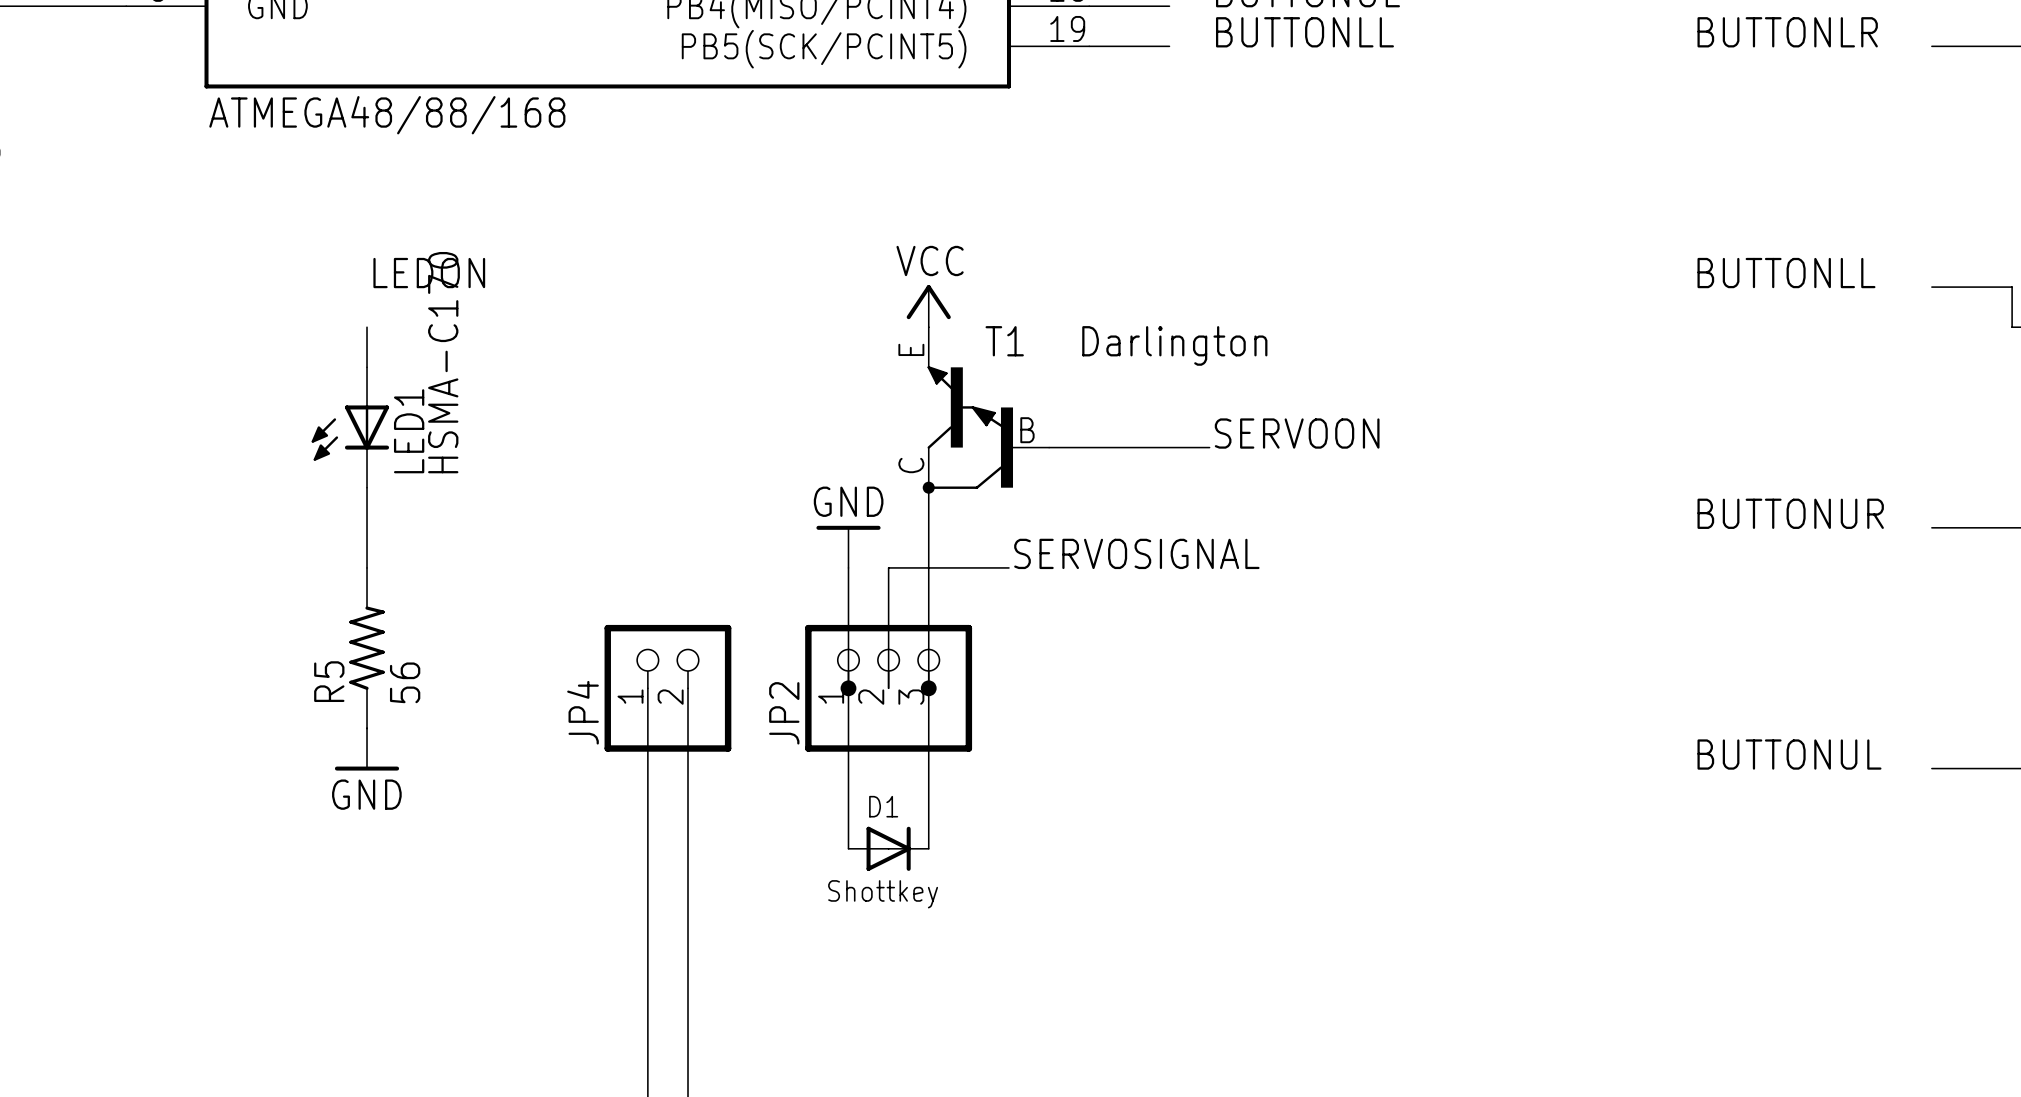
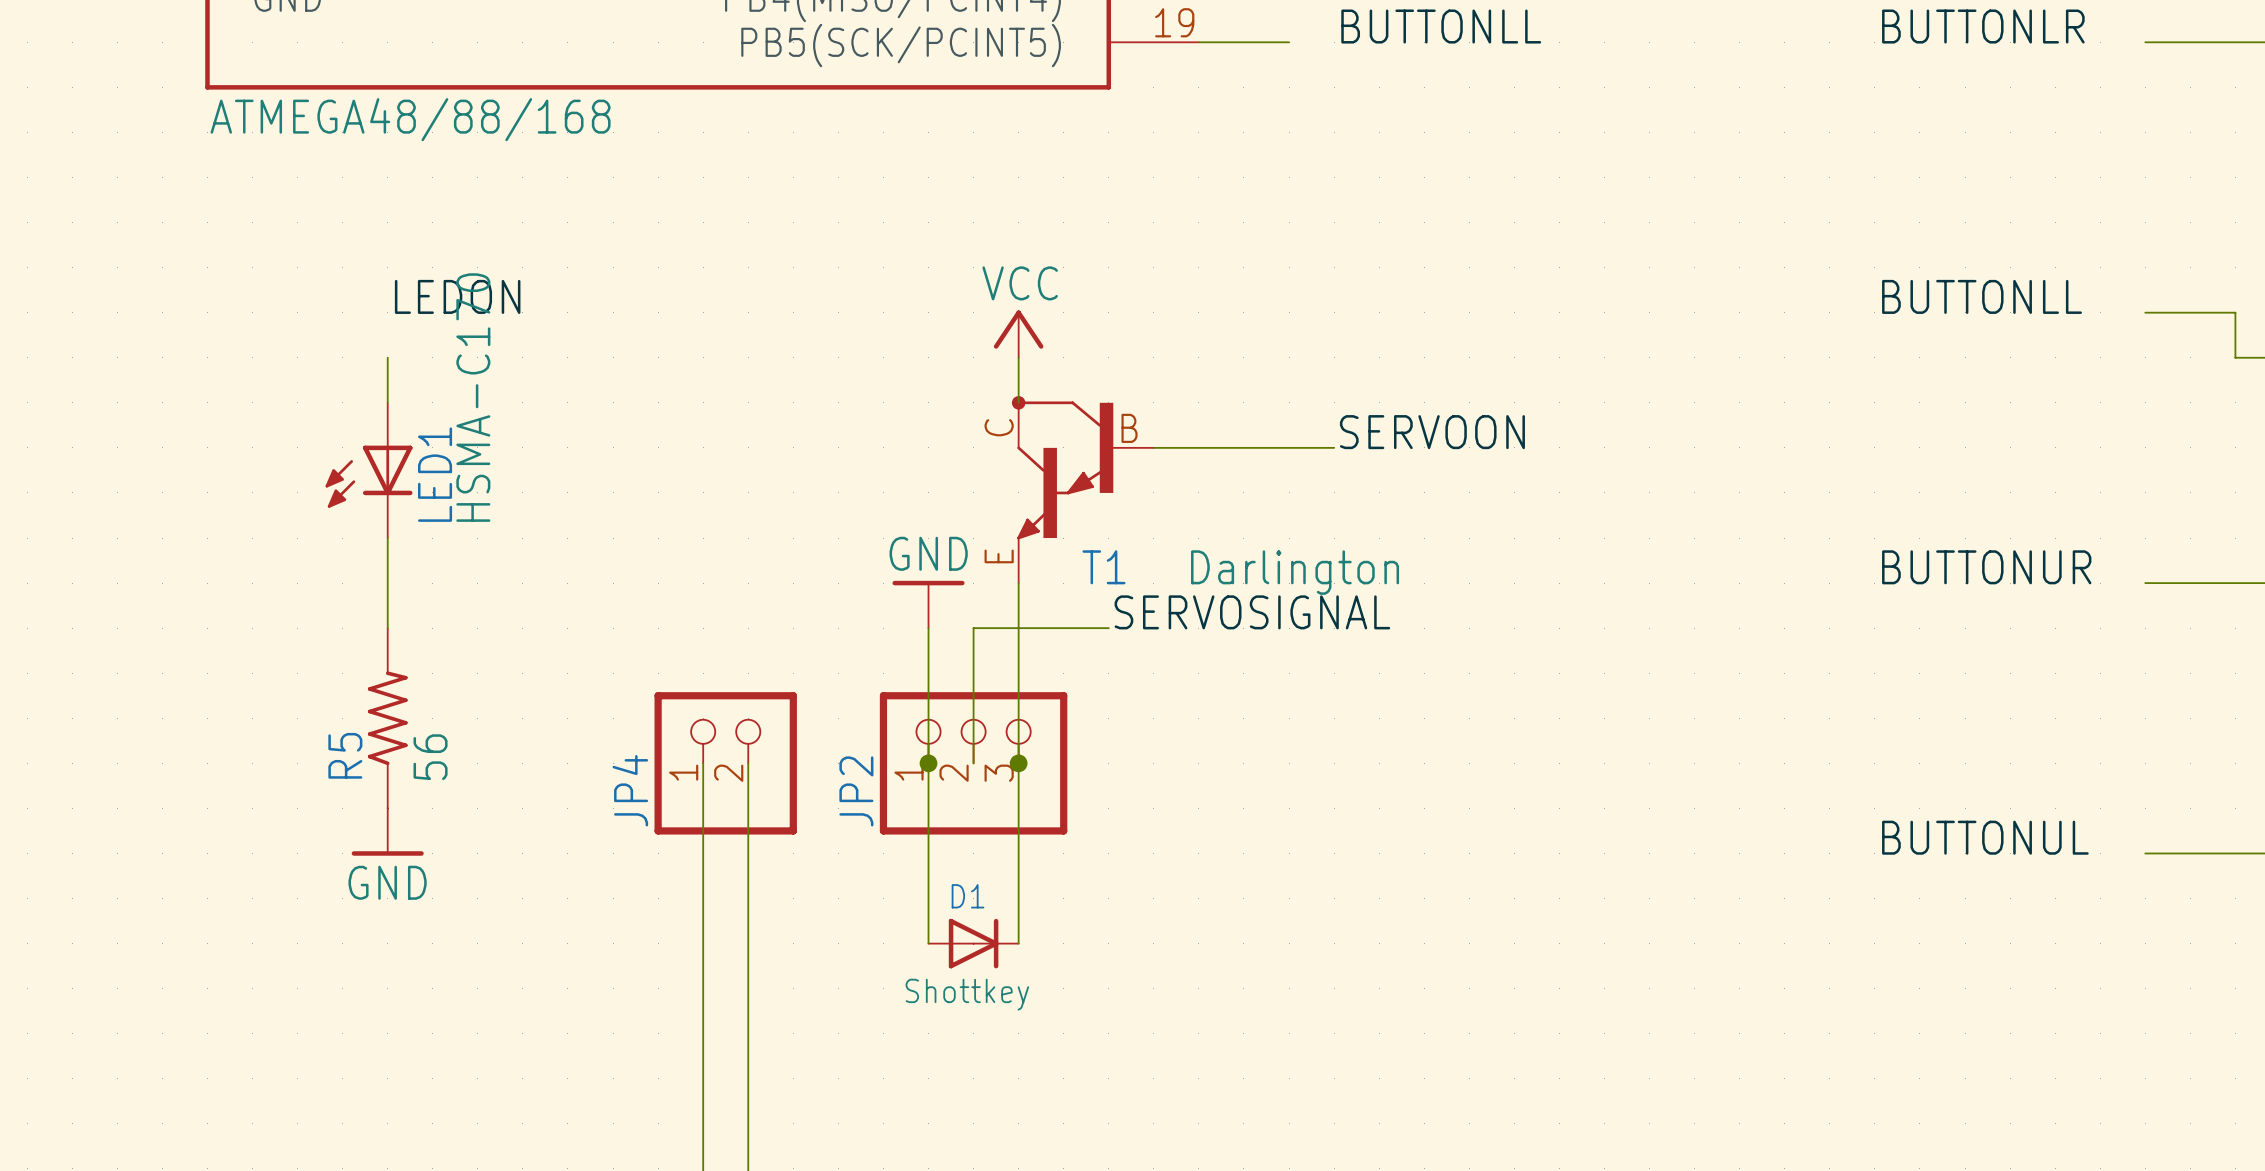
T1 flip: as is (967, 429) -> up-down (1062, 467)
label position: SERVOON (1297, 433) -> SERVOON (1432, 432)
wire: (1049, 447) (1209, 447) -> (1153, 447) (1334, 447)

